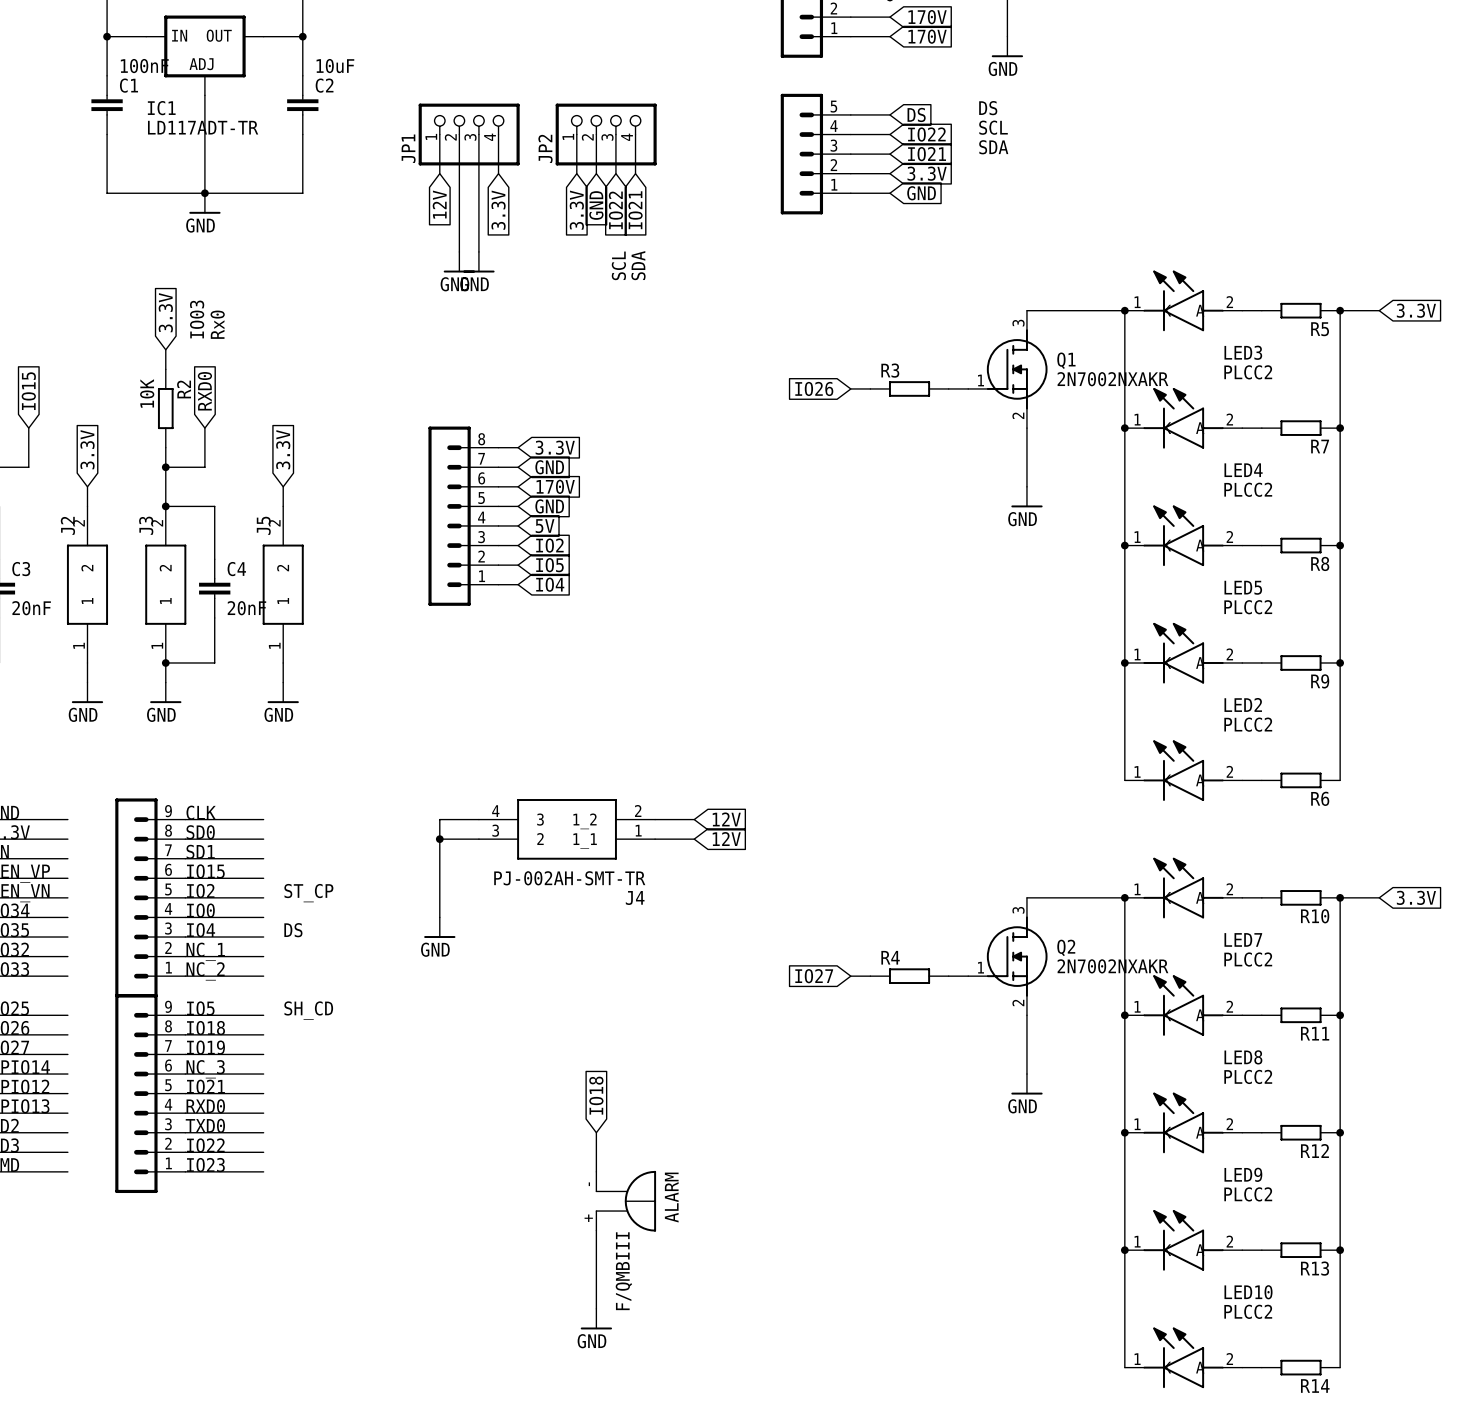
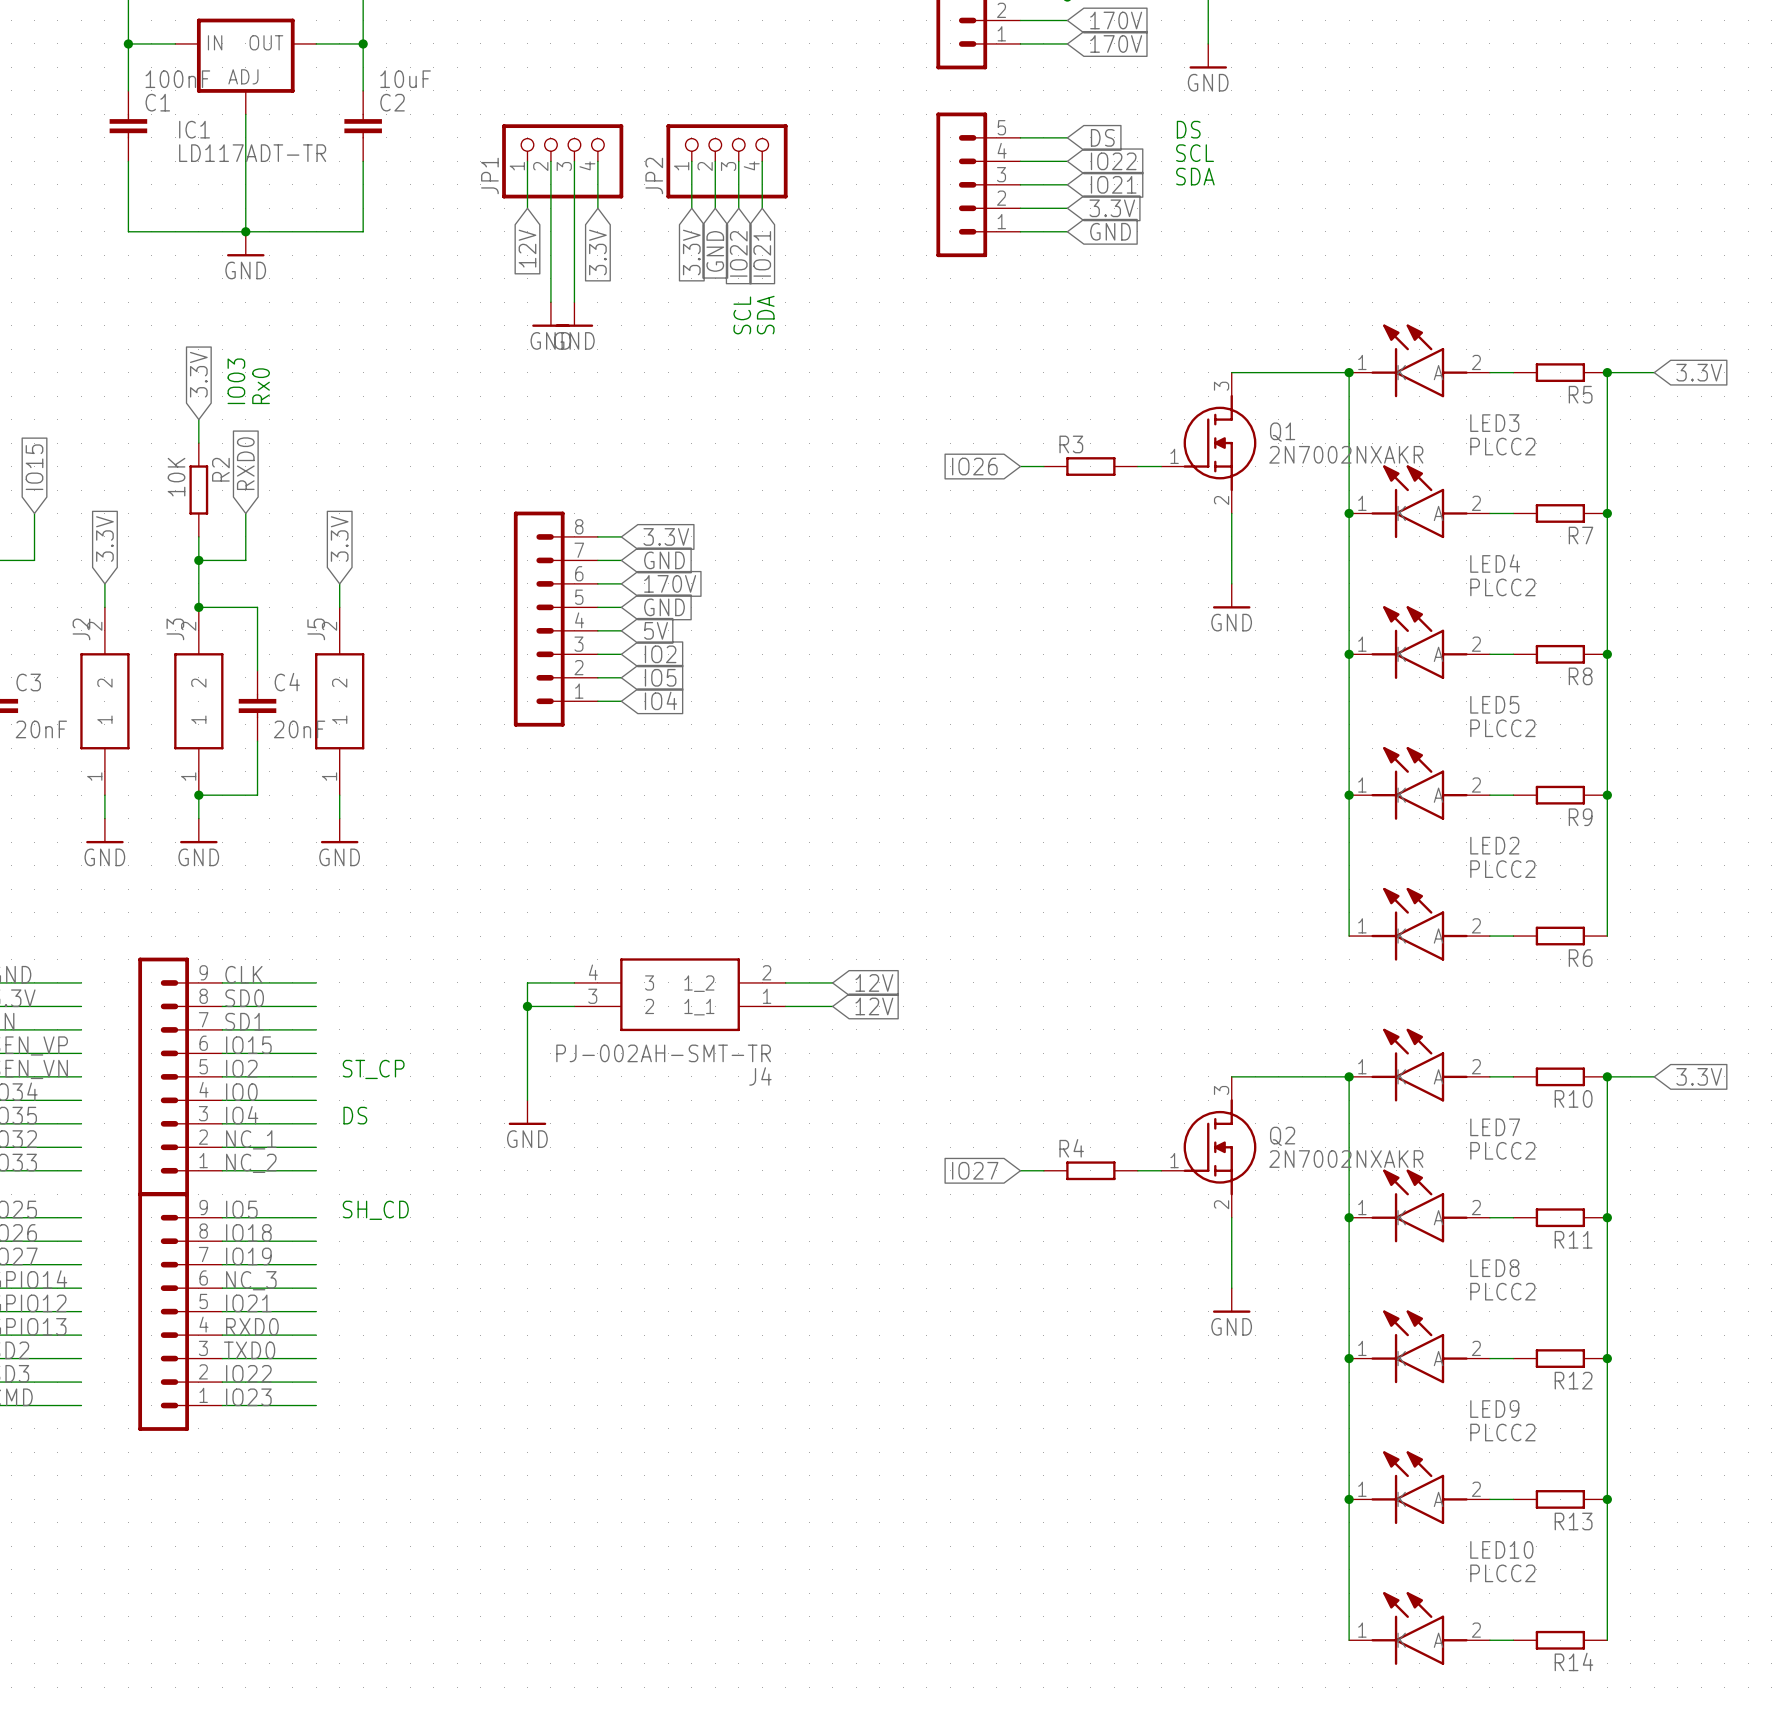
global label: IO18 (596, 1095) -> none
wire: (596, 1132) (596, 1171) -> none
ALARM: F/QMBIII (625, 1201) -> none
wire: (596, 1230) (596, 1308) -> none
power symbol: GND (596, 1319) -> none

